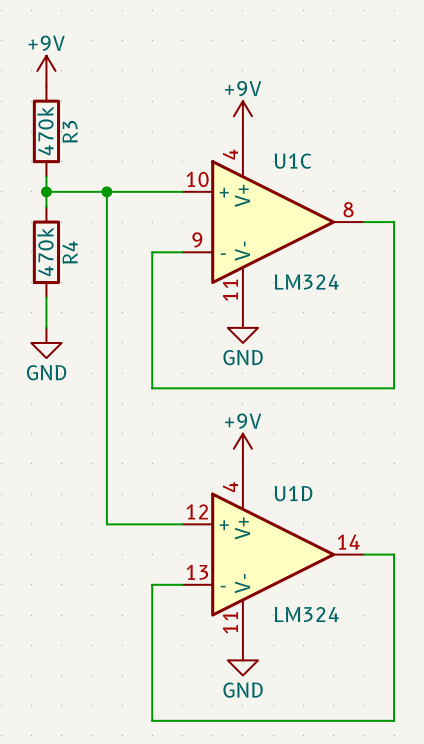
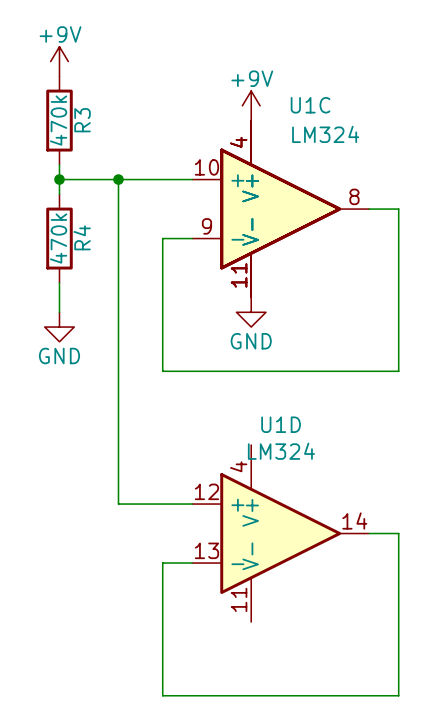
U1C name position: U1C (292, 161) -> U1C (310, 105)
part: none -> (280, 209)
U1C value position: LM324 (306, 281) -> LM324 (325, 134)
power symbol: +9V (242, 448) -> none
U1D name position: U1D (293, 493) -> U1D (281, 424)
U1D value position: LM324 (306, 614) -> LM324 (281, 451)
power symbol: GND (242, 660) -> none

